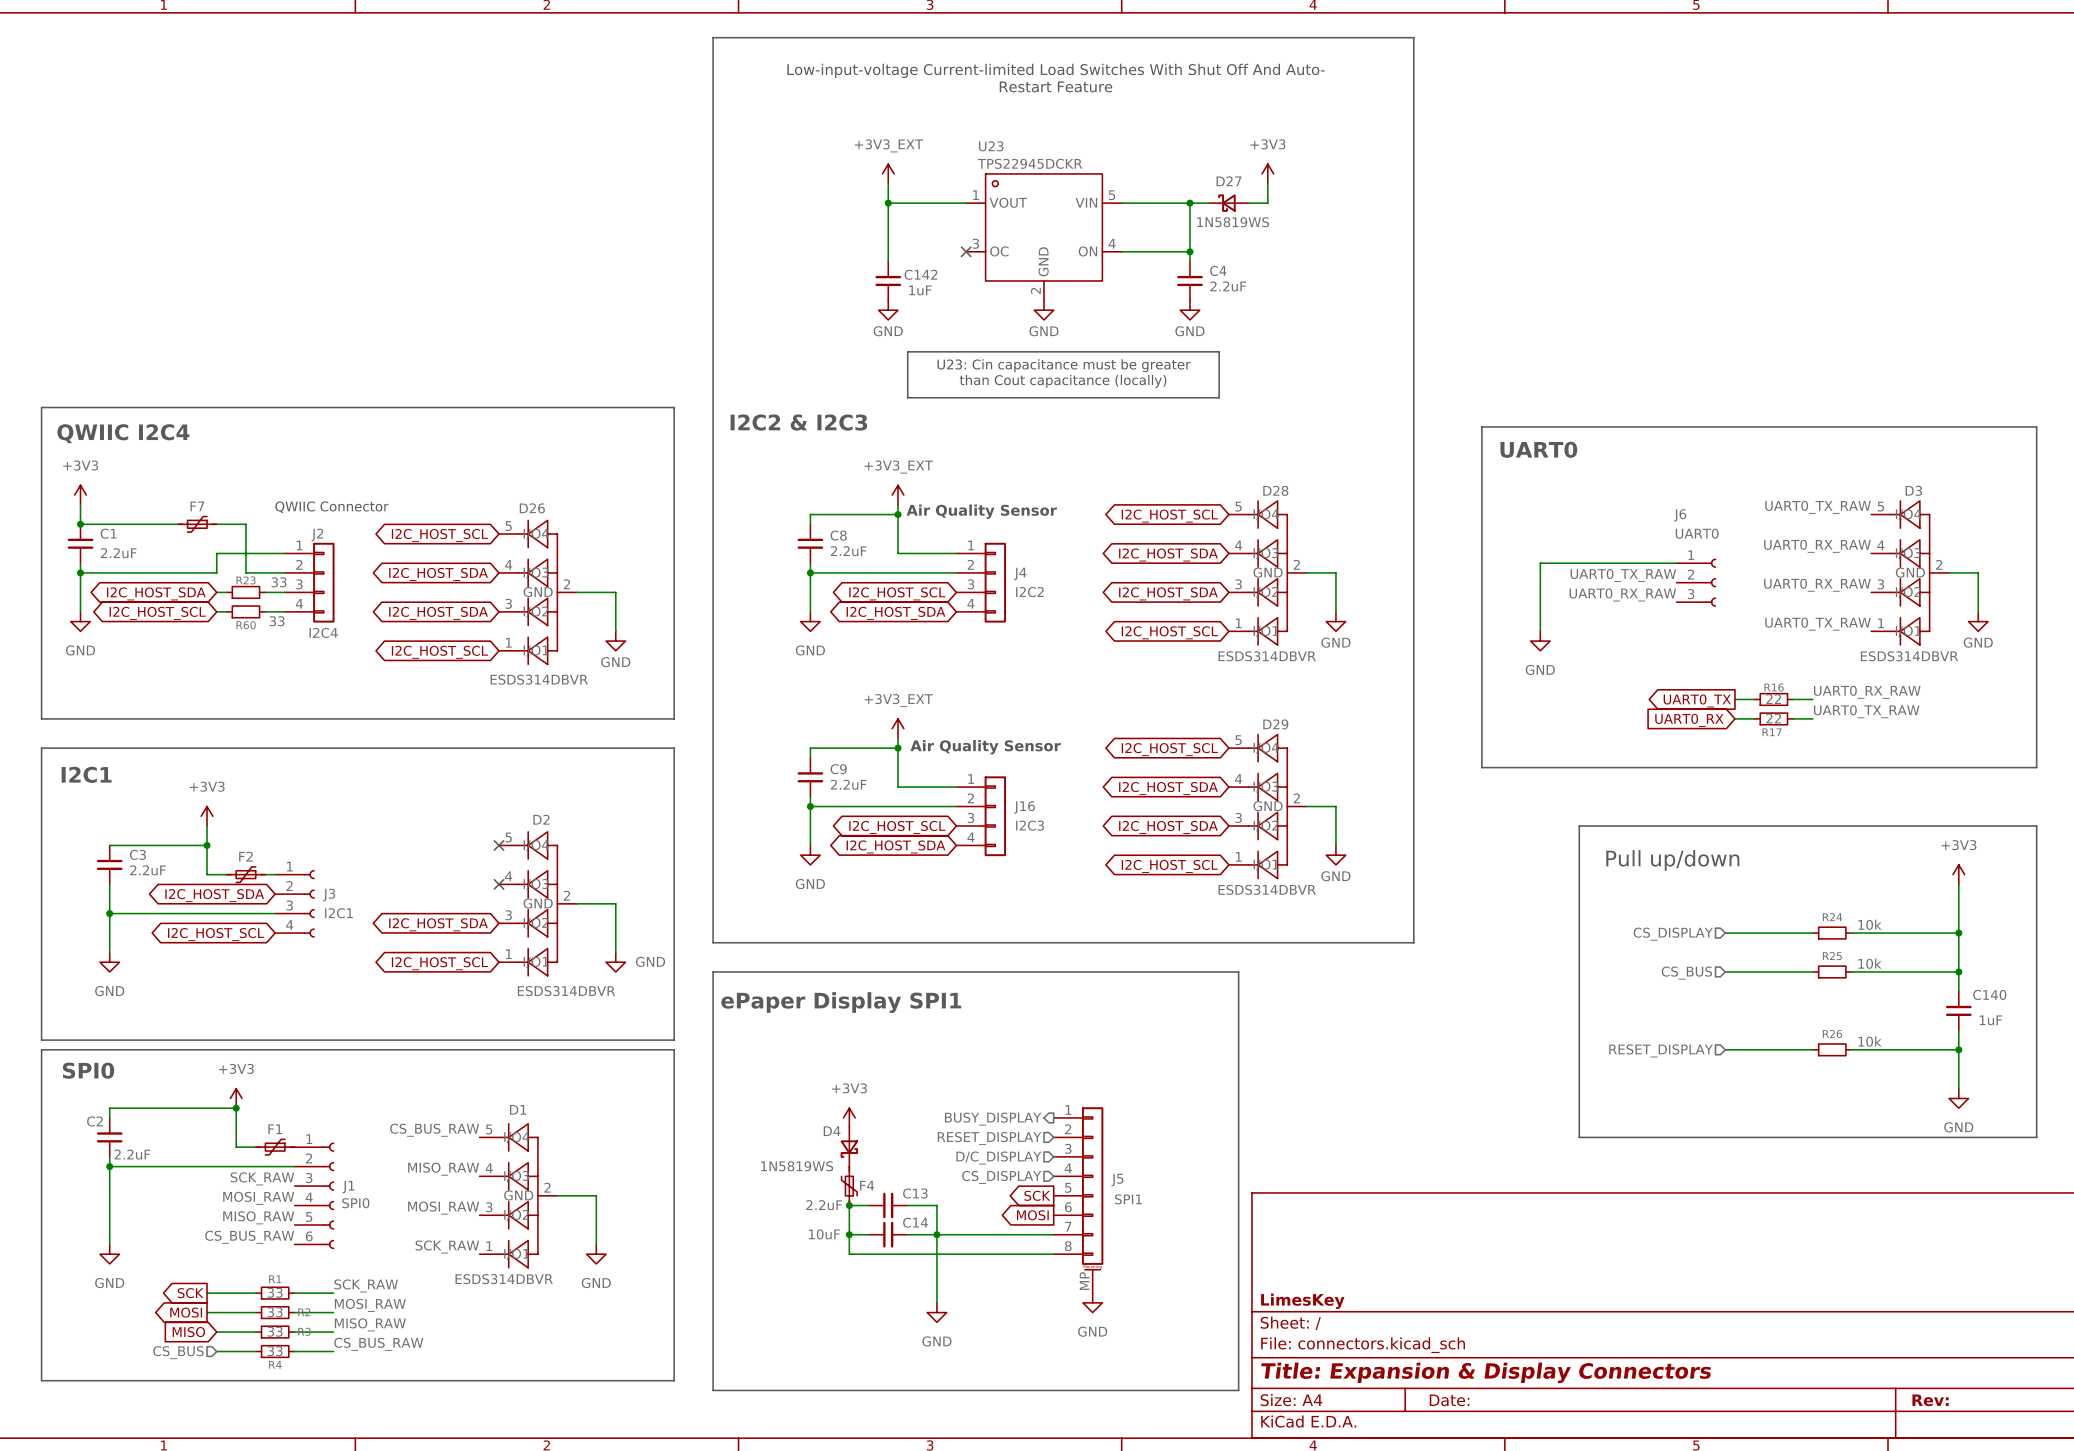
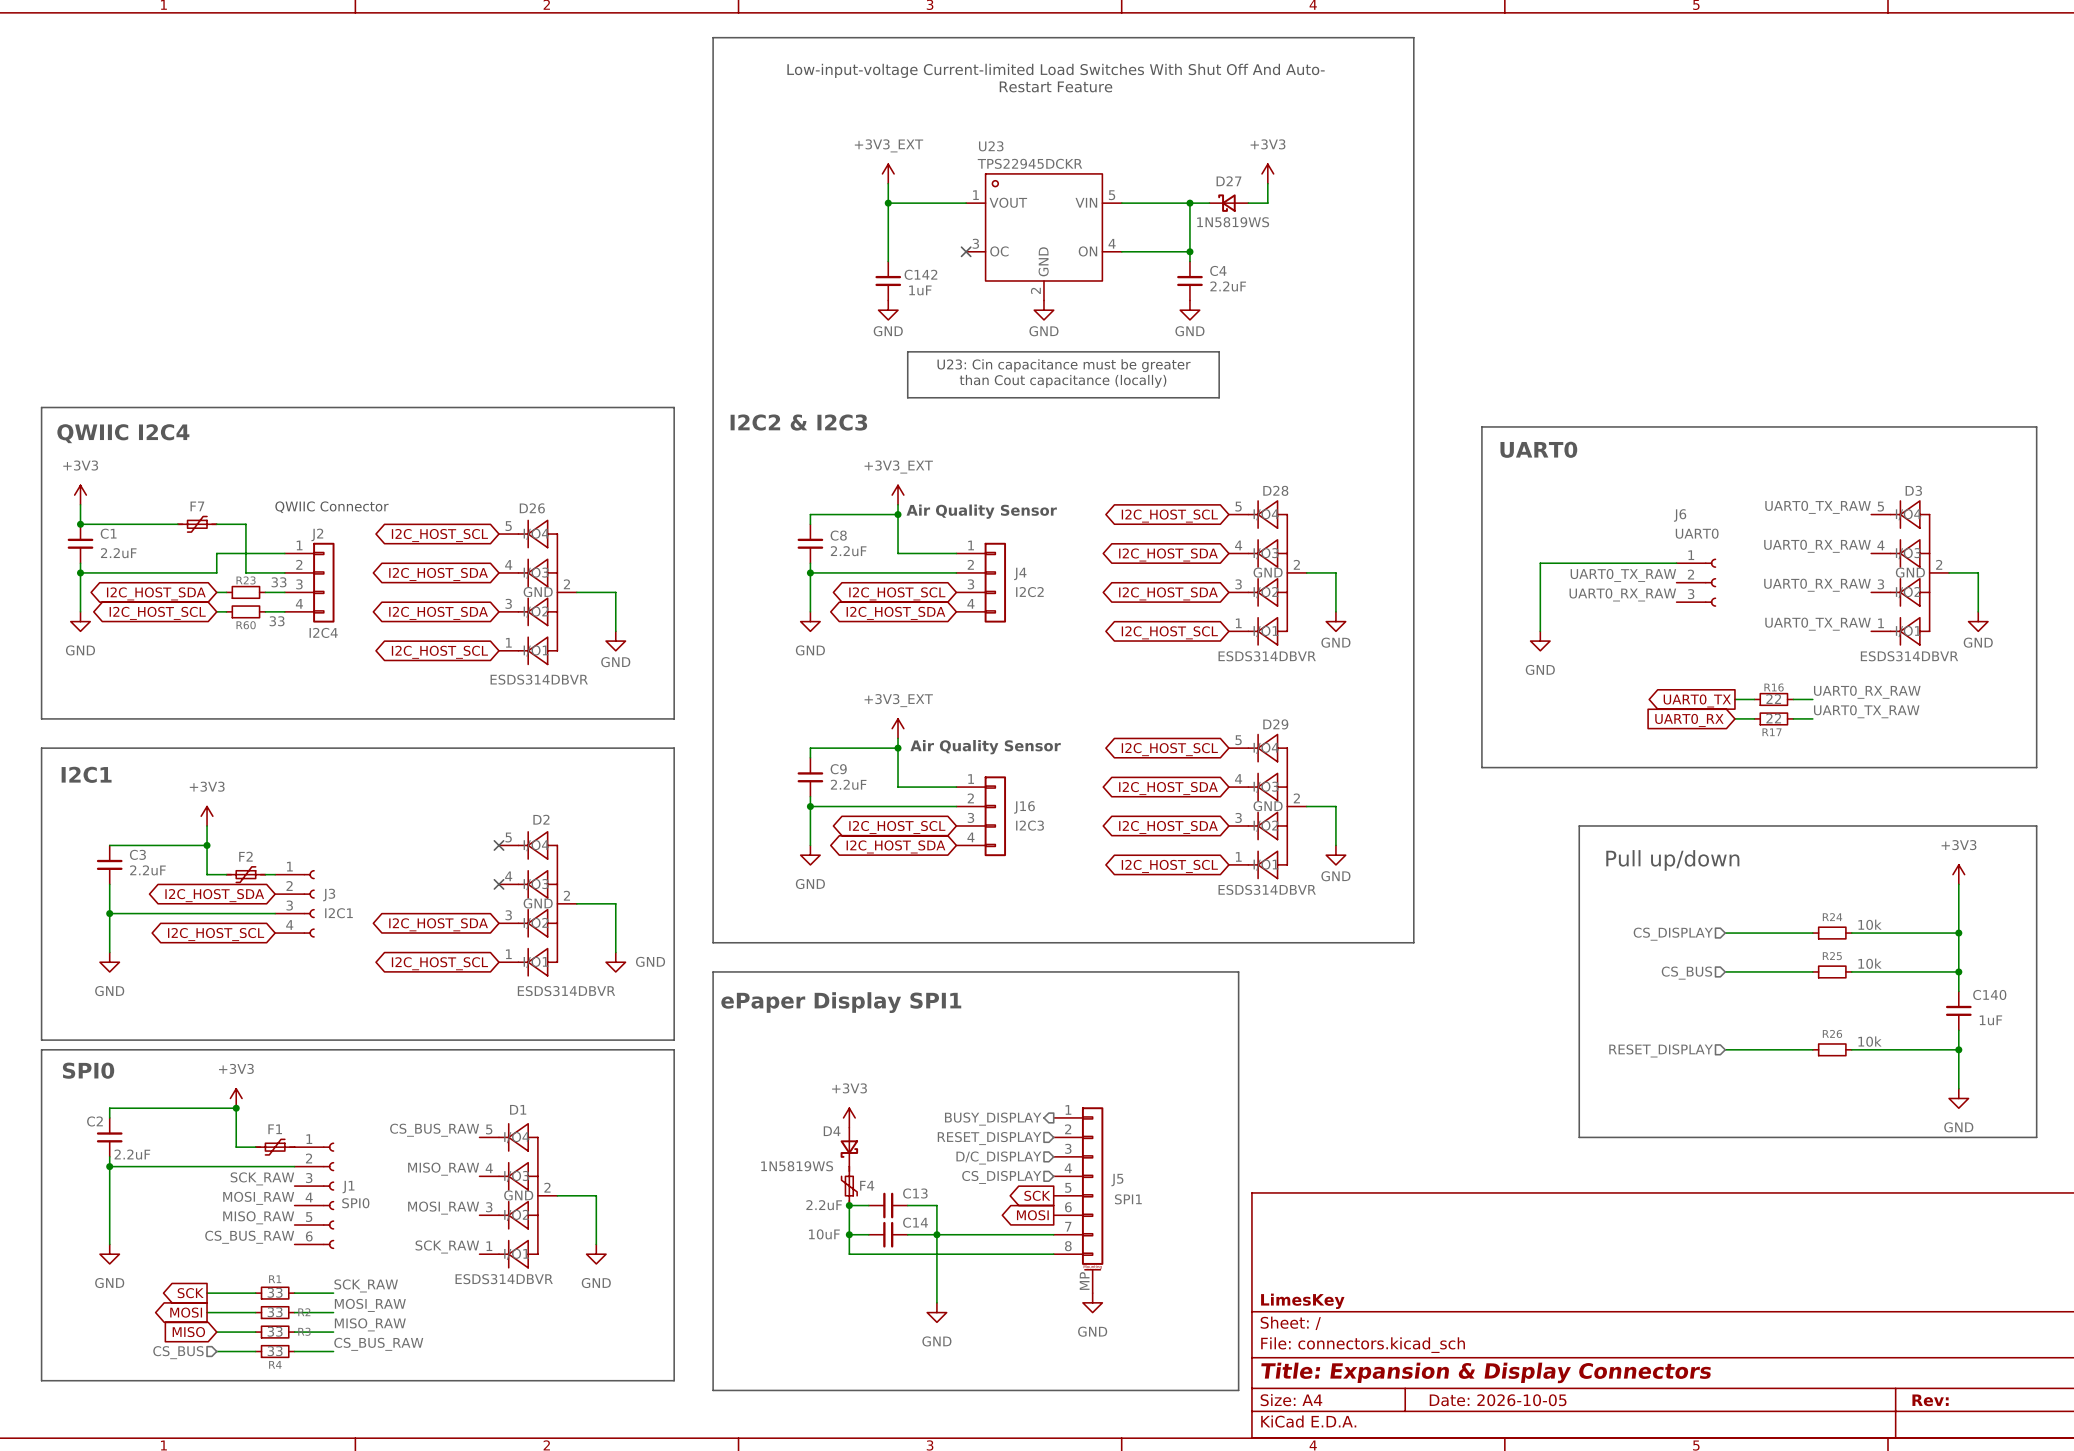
title block: Date: (1449, 1400) -> Date: 2026-10-05 (1498, 1400)

